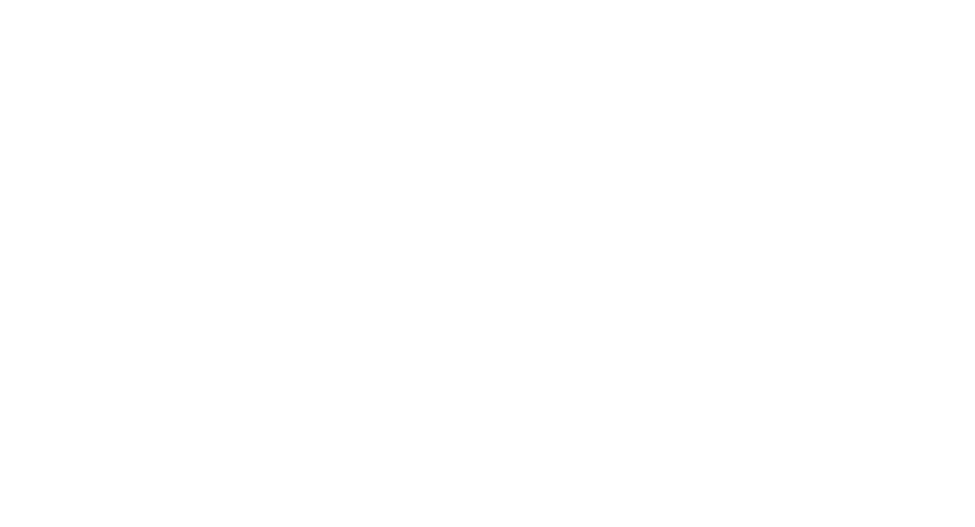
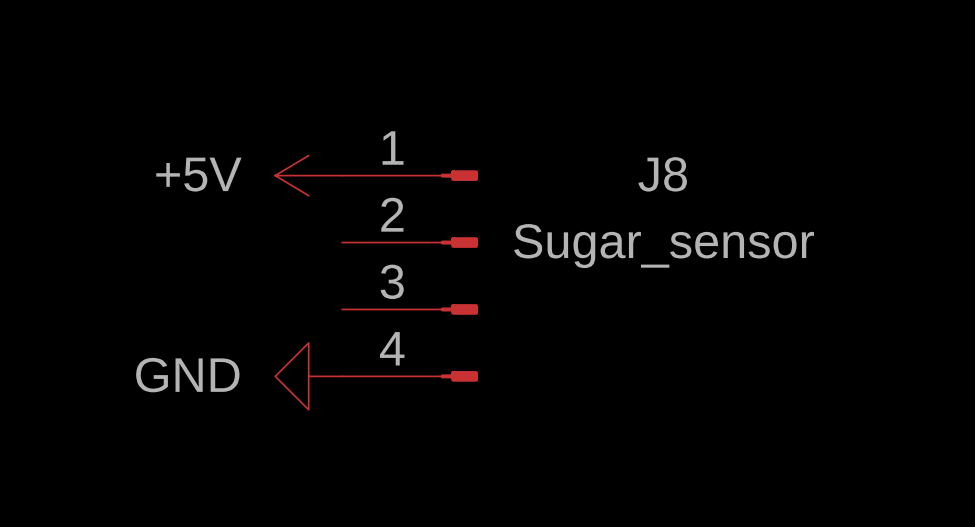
power symbol: none -> +5V (308, 175)
J8: none -> Sugar_sensor (410, 276)
power symbol: none -> GND (308, 376)

